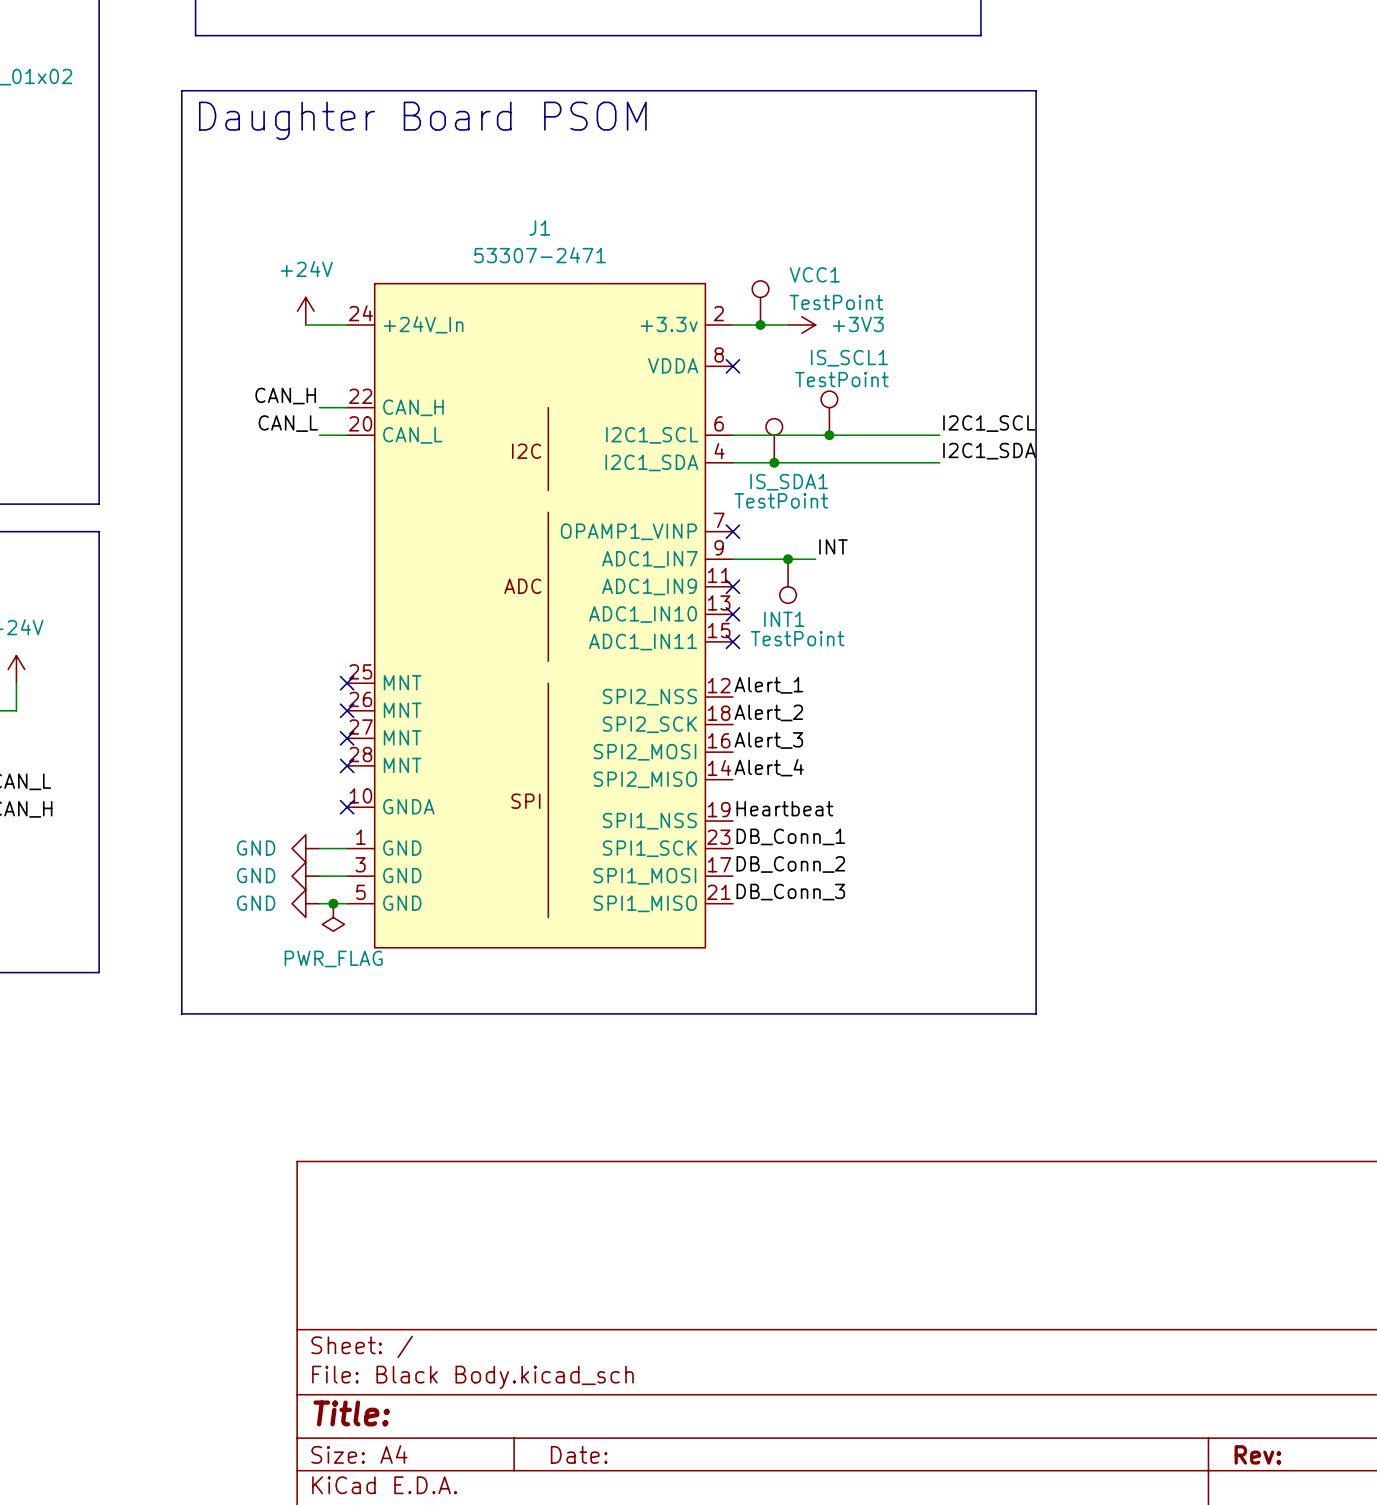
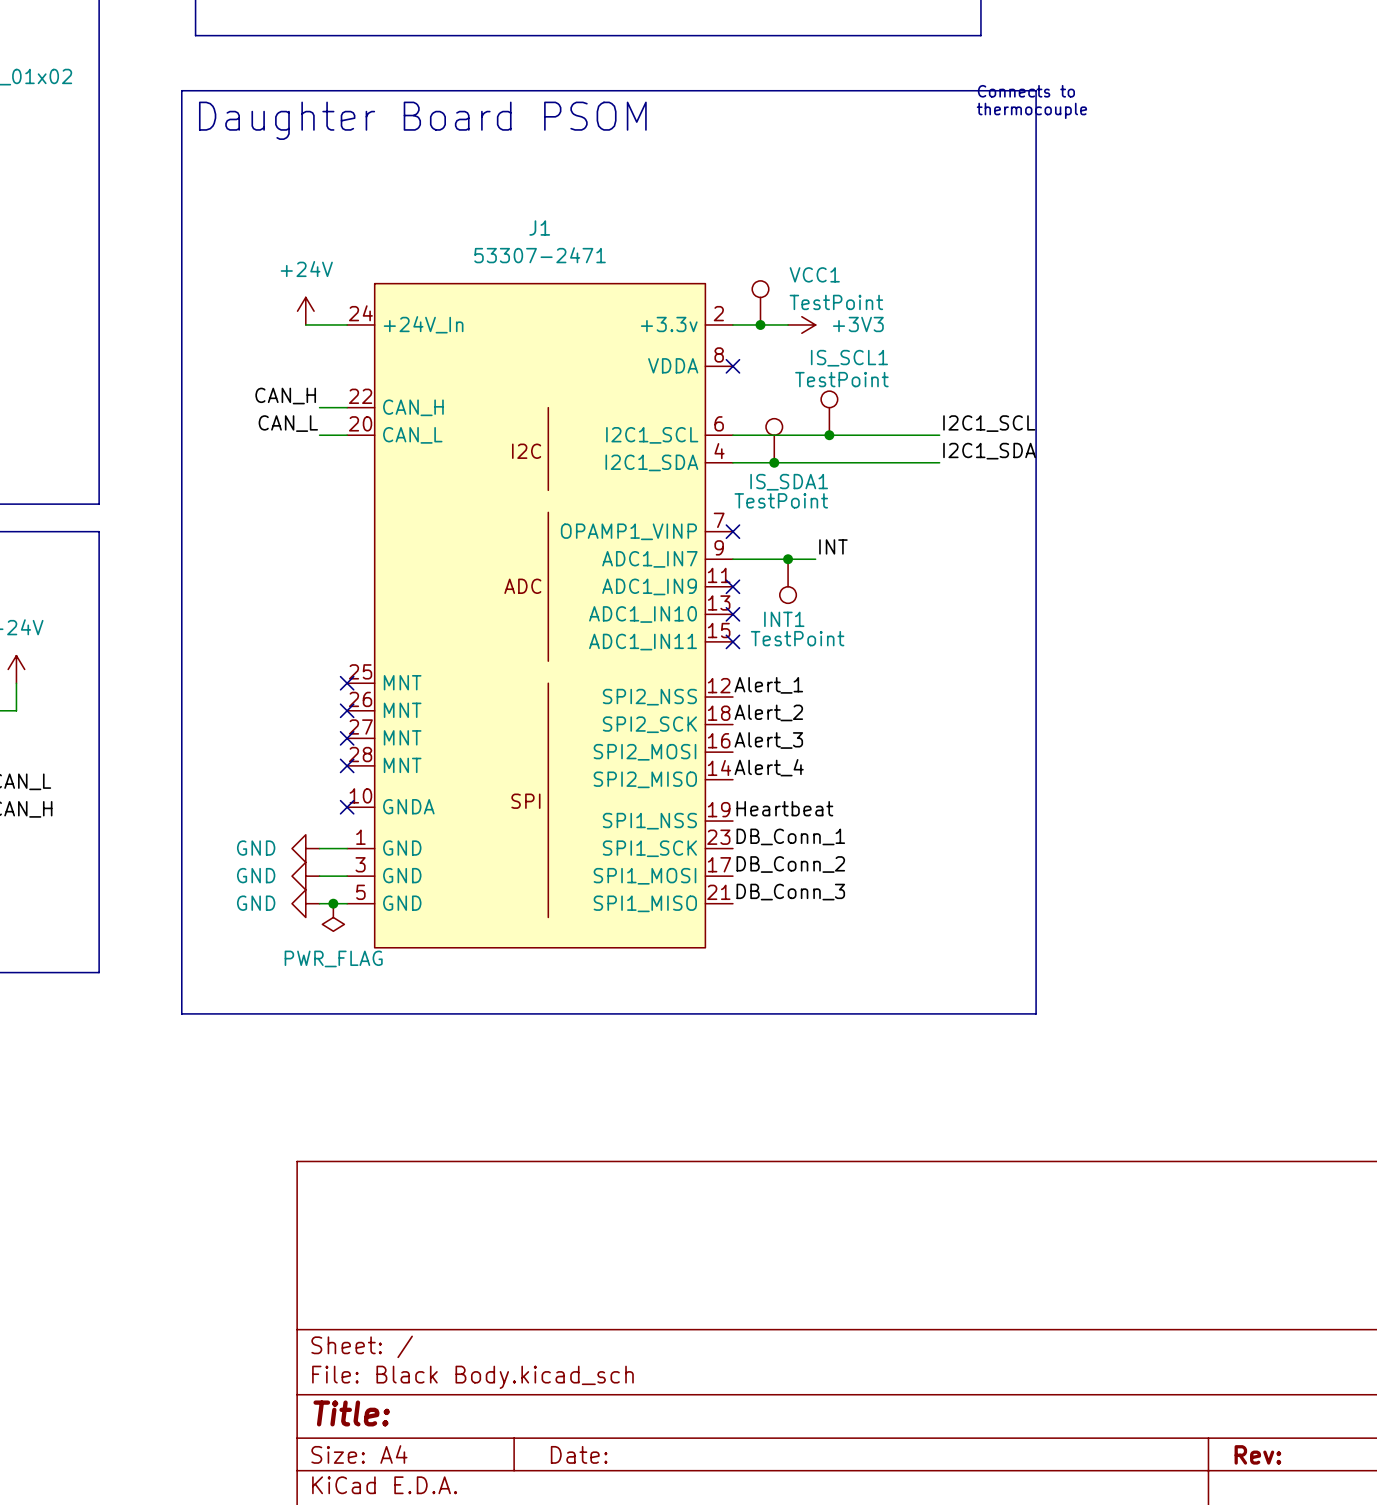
text: none -> Connects to (1026, 91)
text: none -> thermocouple (1031, 110)

